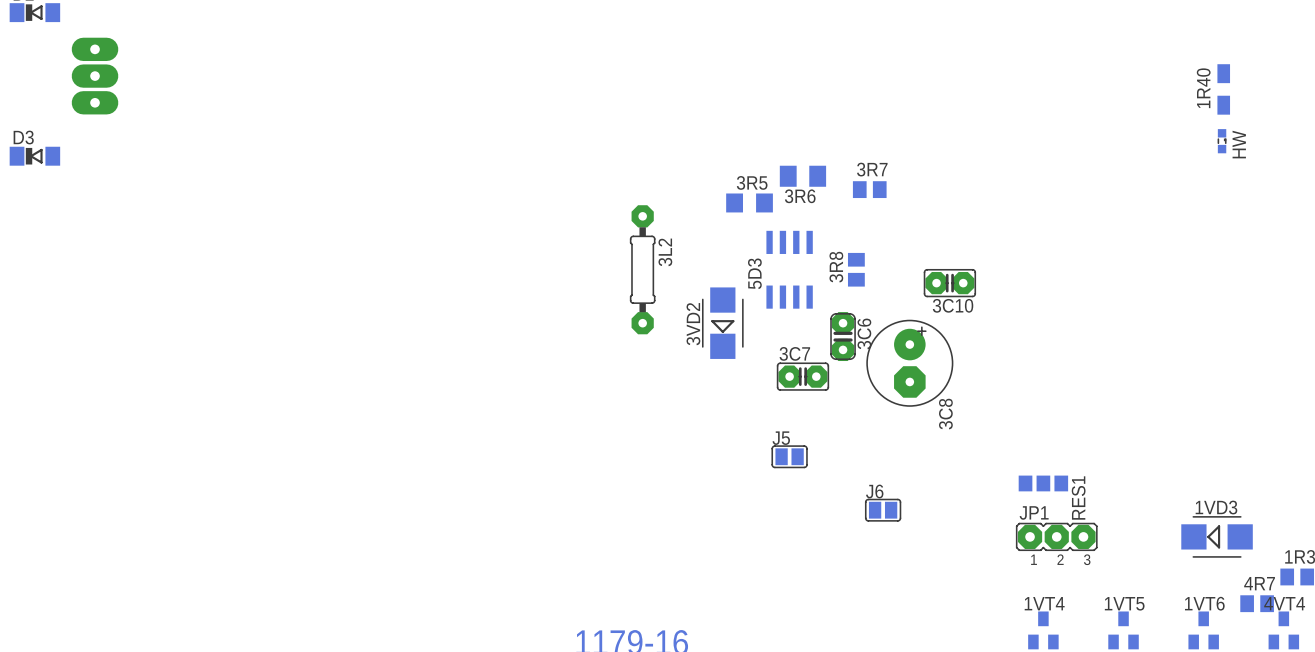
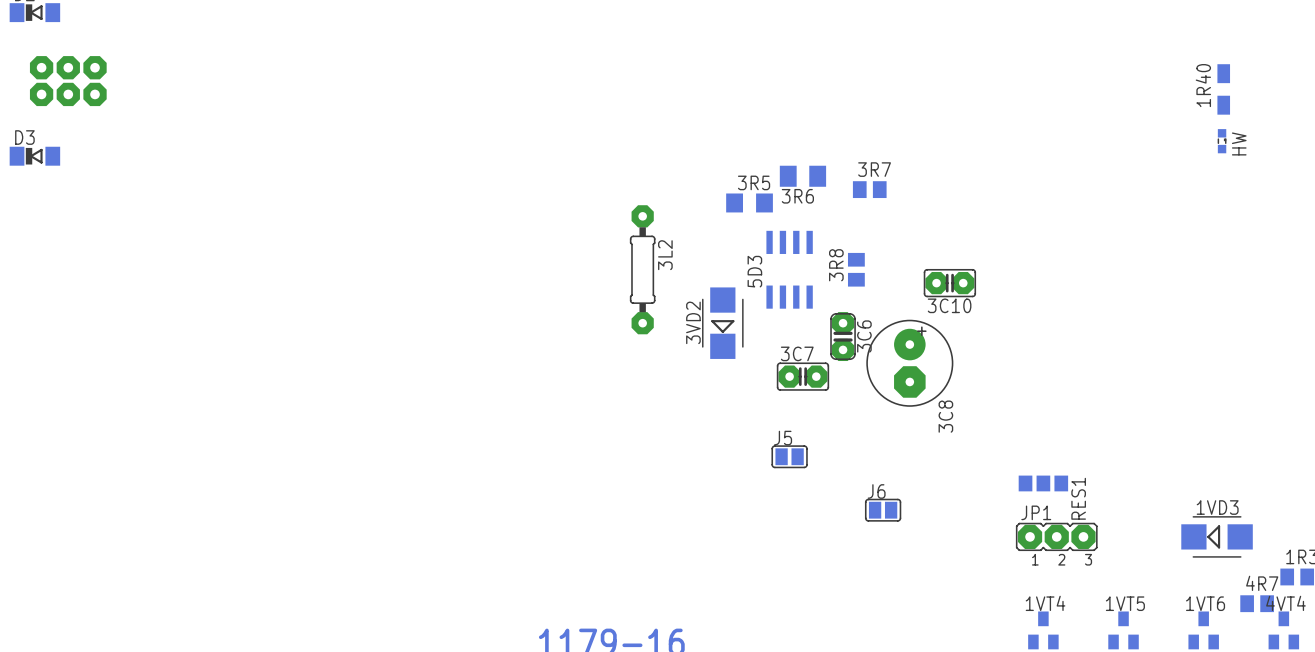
part: (95, 76) -> none
part: none -> (68, 81)

